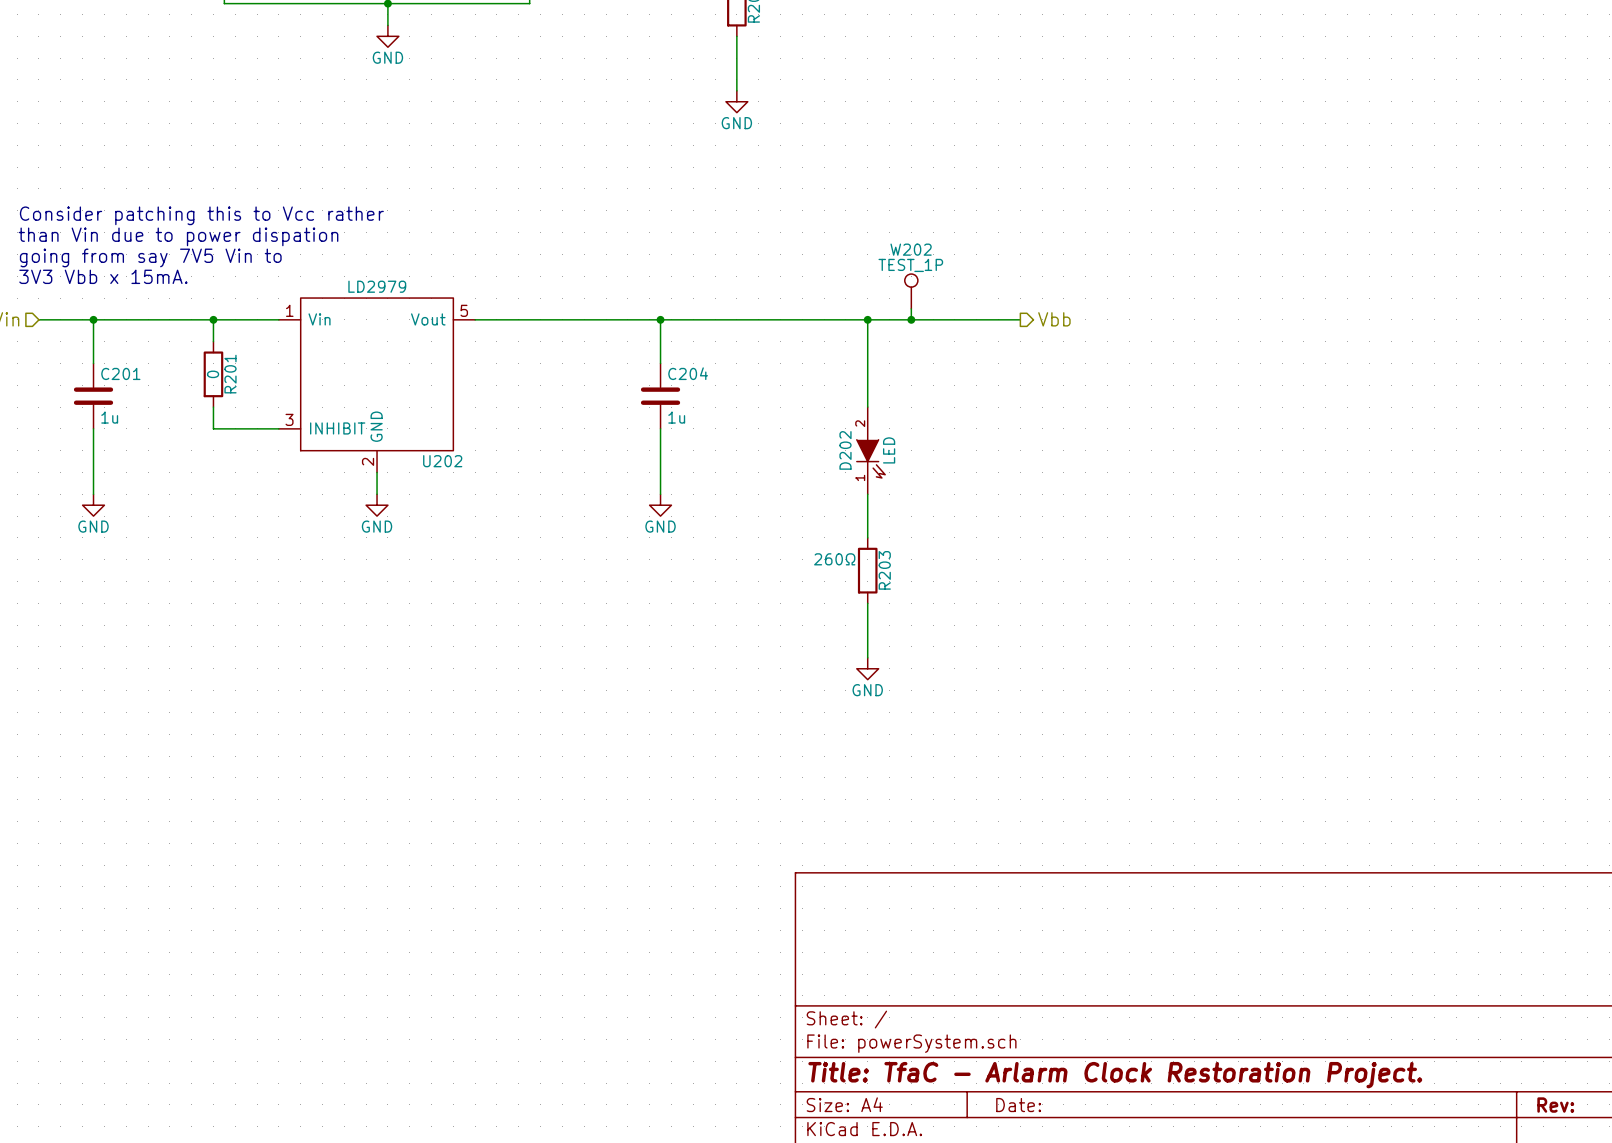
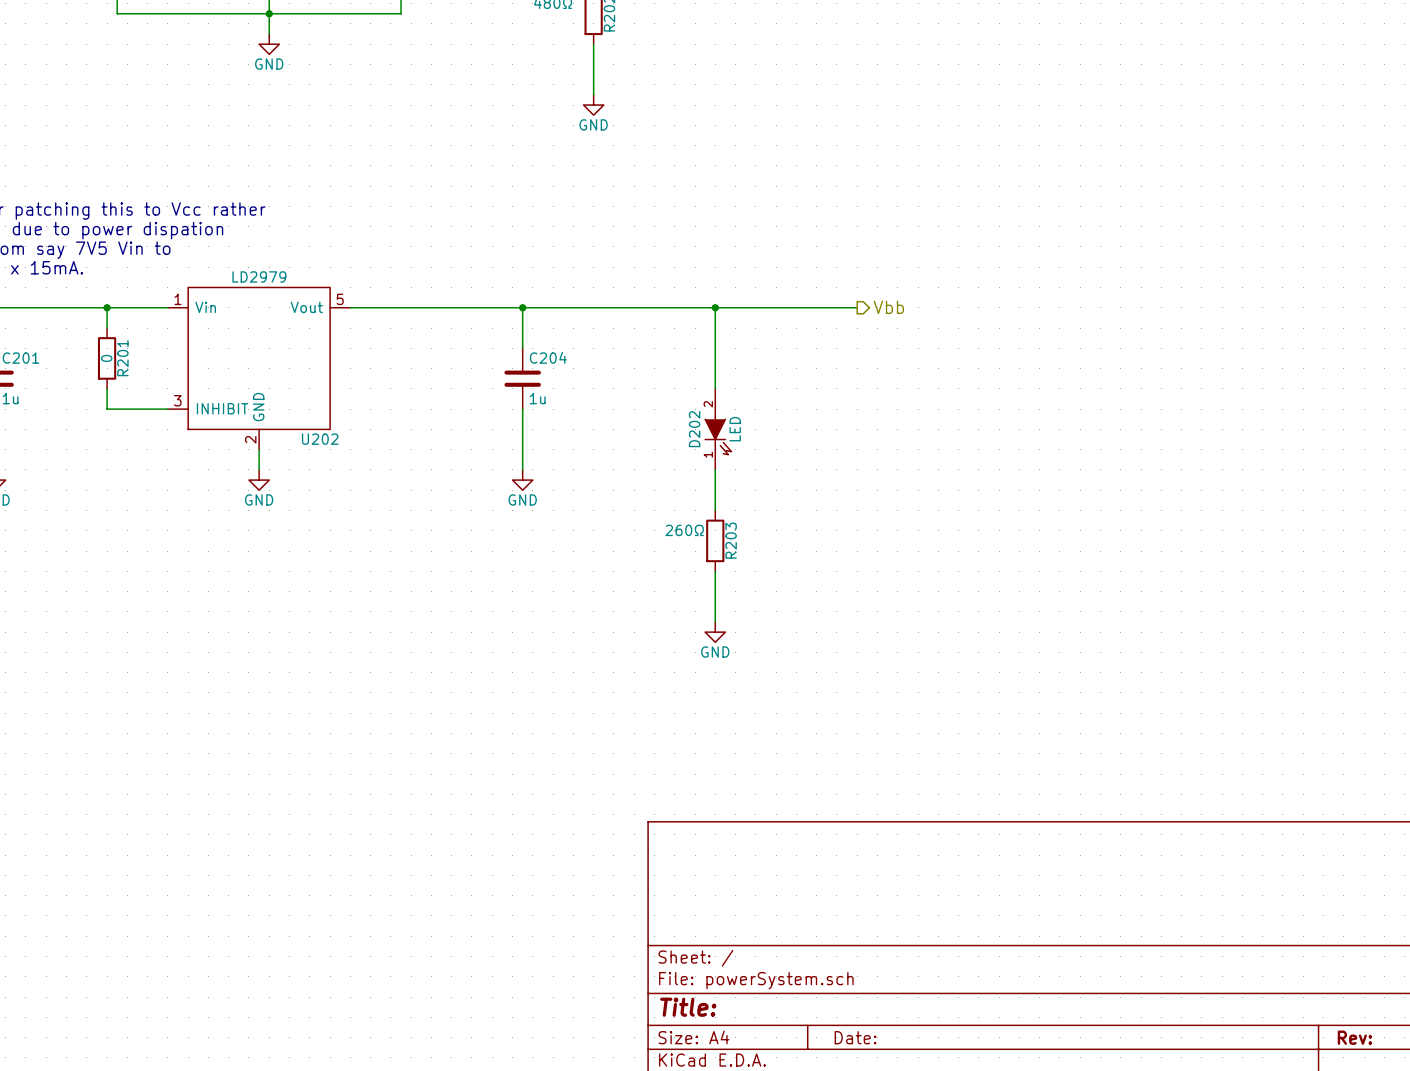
W202: TEST_1P (911, 291) -> none
wire: (911, 308) (911, 319) -> none
junction: (911, 319) -> none
title block: Title: TfaC - Arlarm Clock Restoration Project. (1115, 1075) -> Title: (688, 1007)

